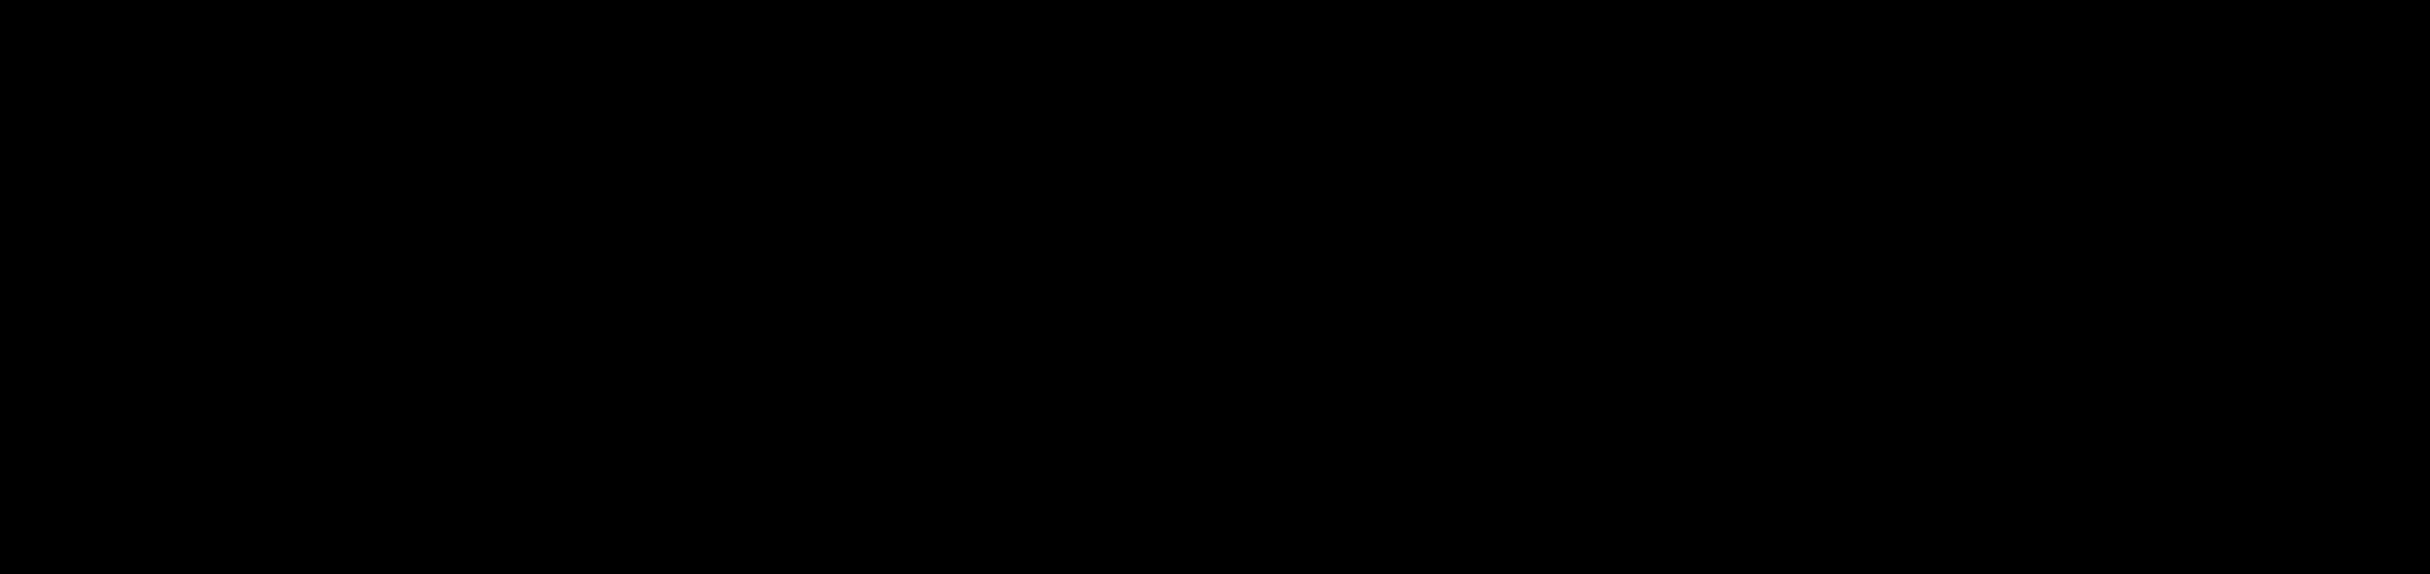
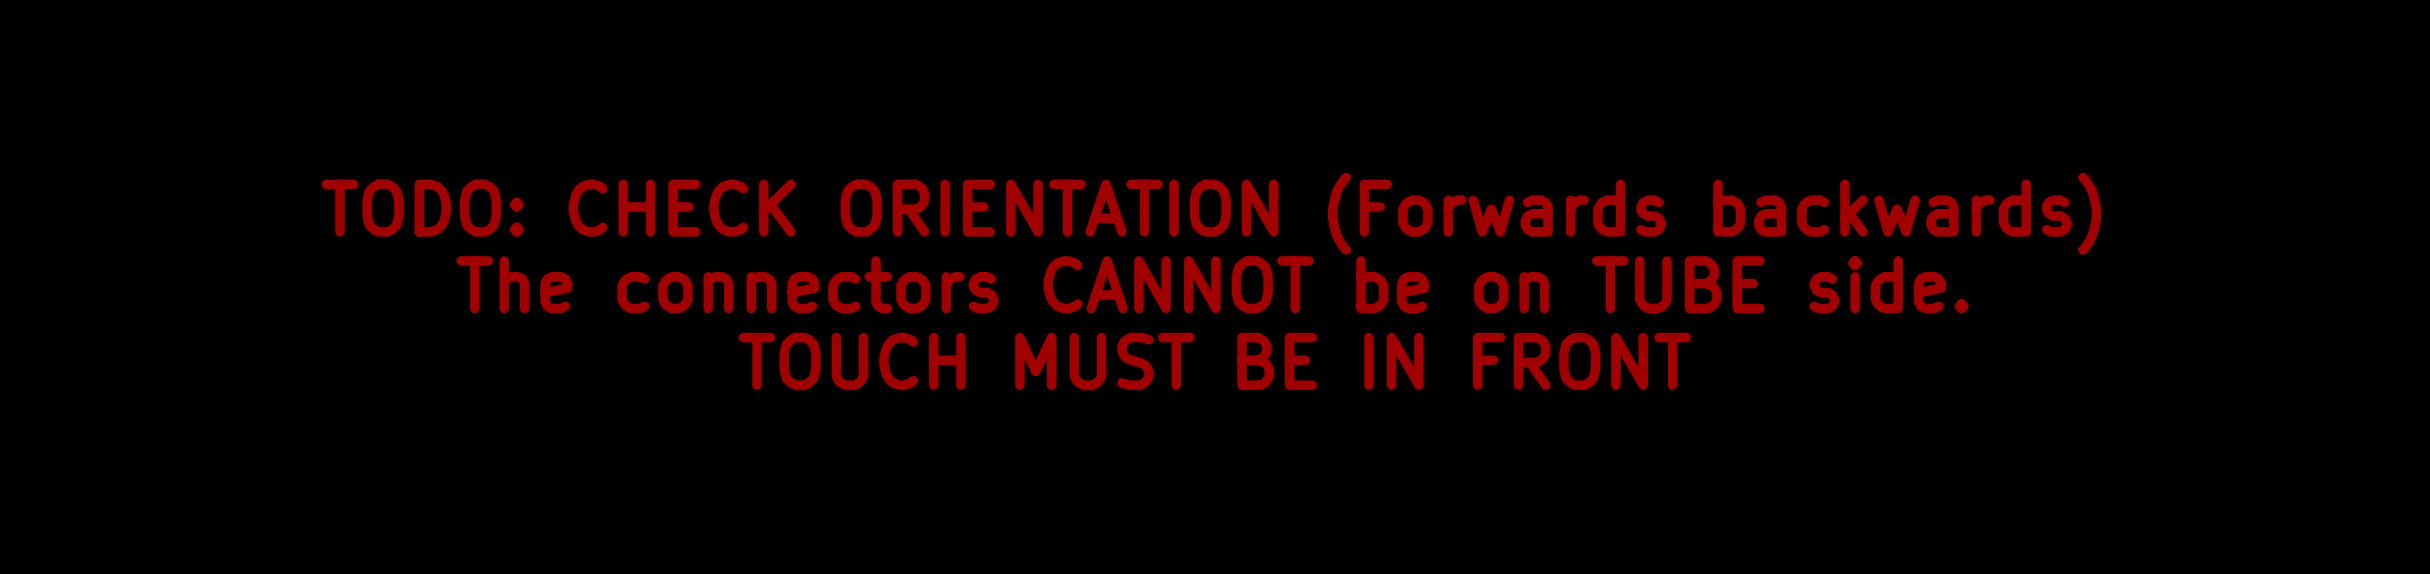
text: none -> TODO: CHECK ORIENTATION (Forwards backwards) (1211, 213)
text: none -> The connectors CANNOT be on TUBE side. (1212, 284)
text: none -> TOUCH MUST BE IN FRONT (1214, 361)

